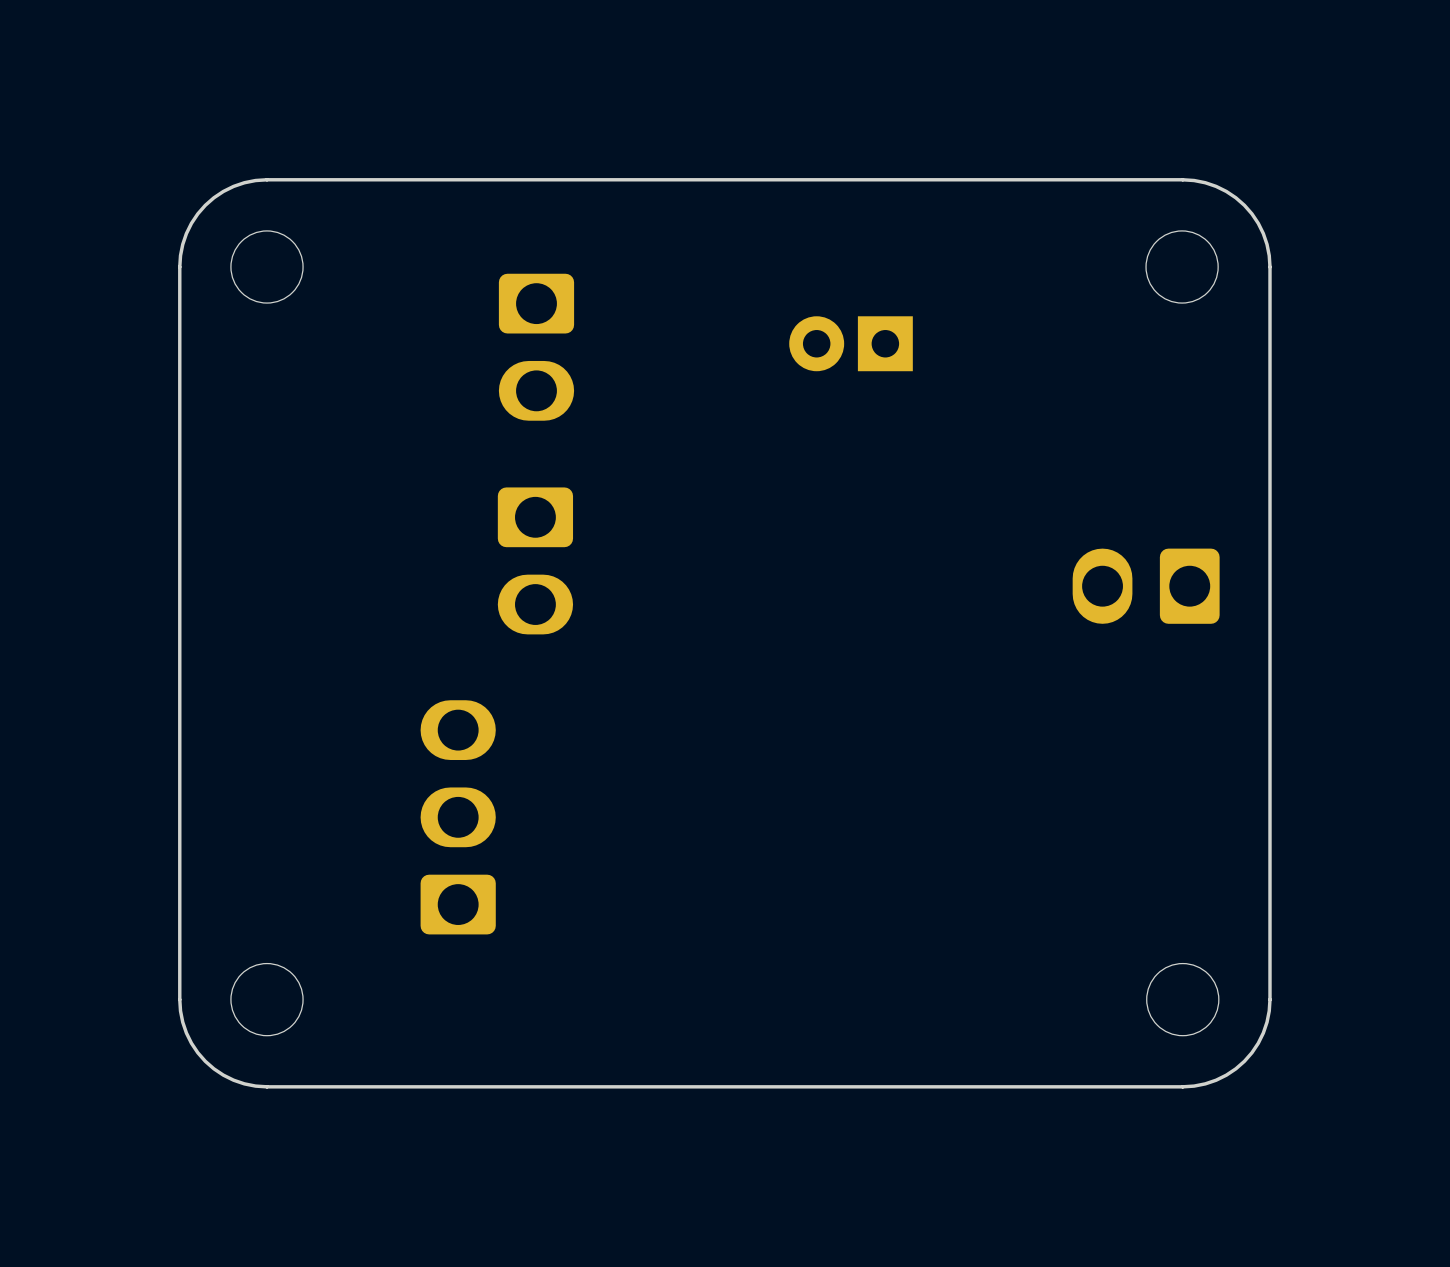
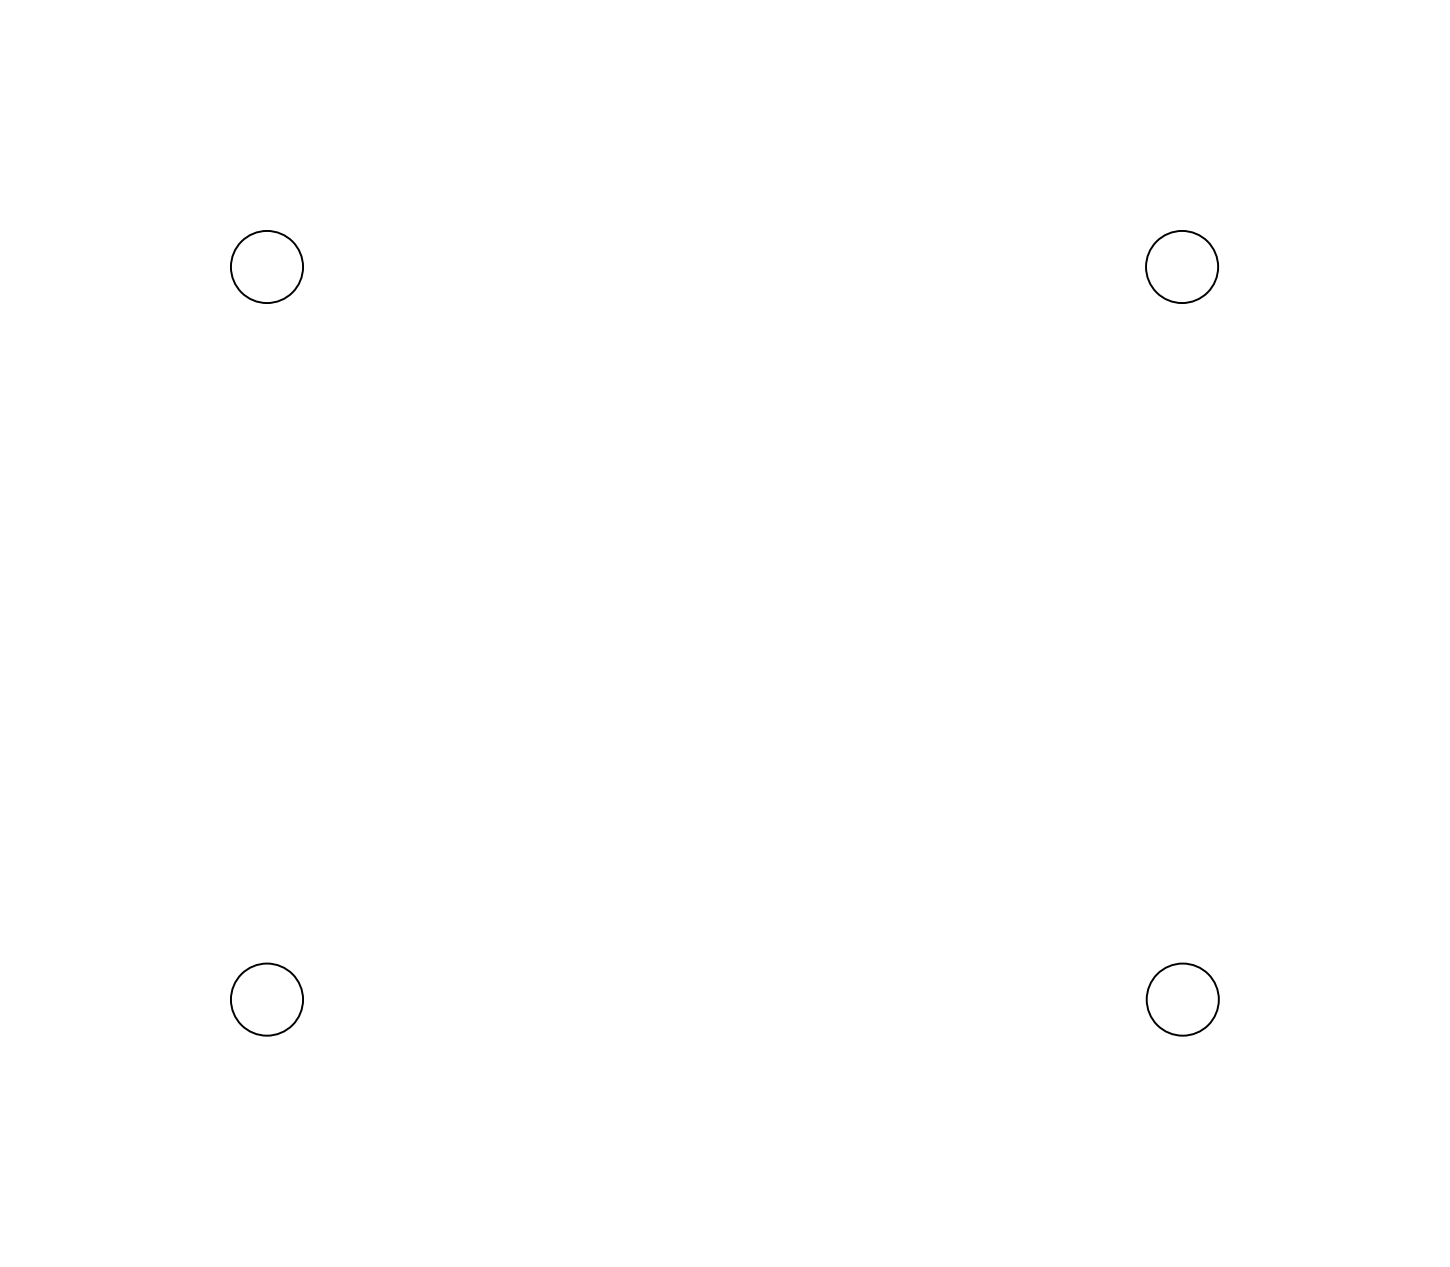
board edge: (1182, 179) (266, 179) (233, 186) (205, 205) (186, 233) (179, 266) (179, 999) (186, 1032) (205, 1061) (233, 1080) (266, 1086) (1182, 1086) (1216, 1080) (1244, 1061) (1263, 1032) (1269, 999) (1269, 255) (1258, 223) (1235, 197) (1205, 182) (1182, 179) -> none
part: (851, 343) -> none
part: (536, 347) -> none
part: (535, 560) -> none
part: (1146, 586) -> none
part: (458, 817) -> none

